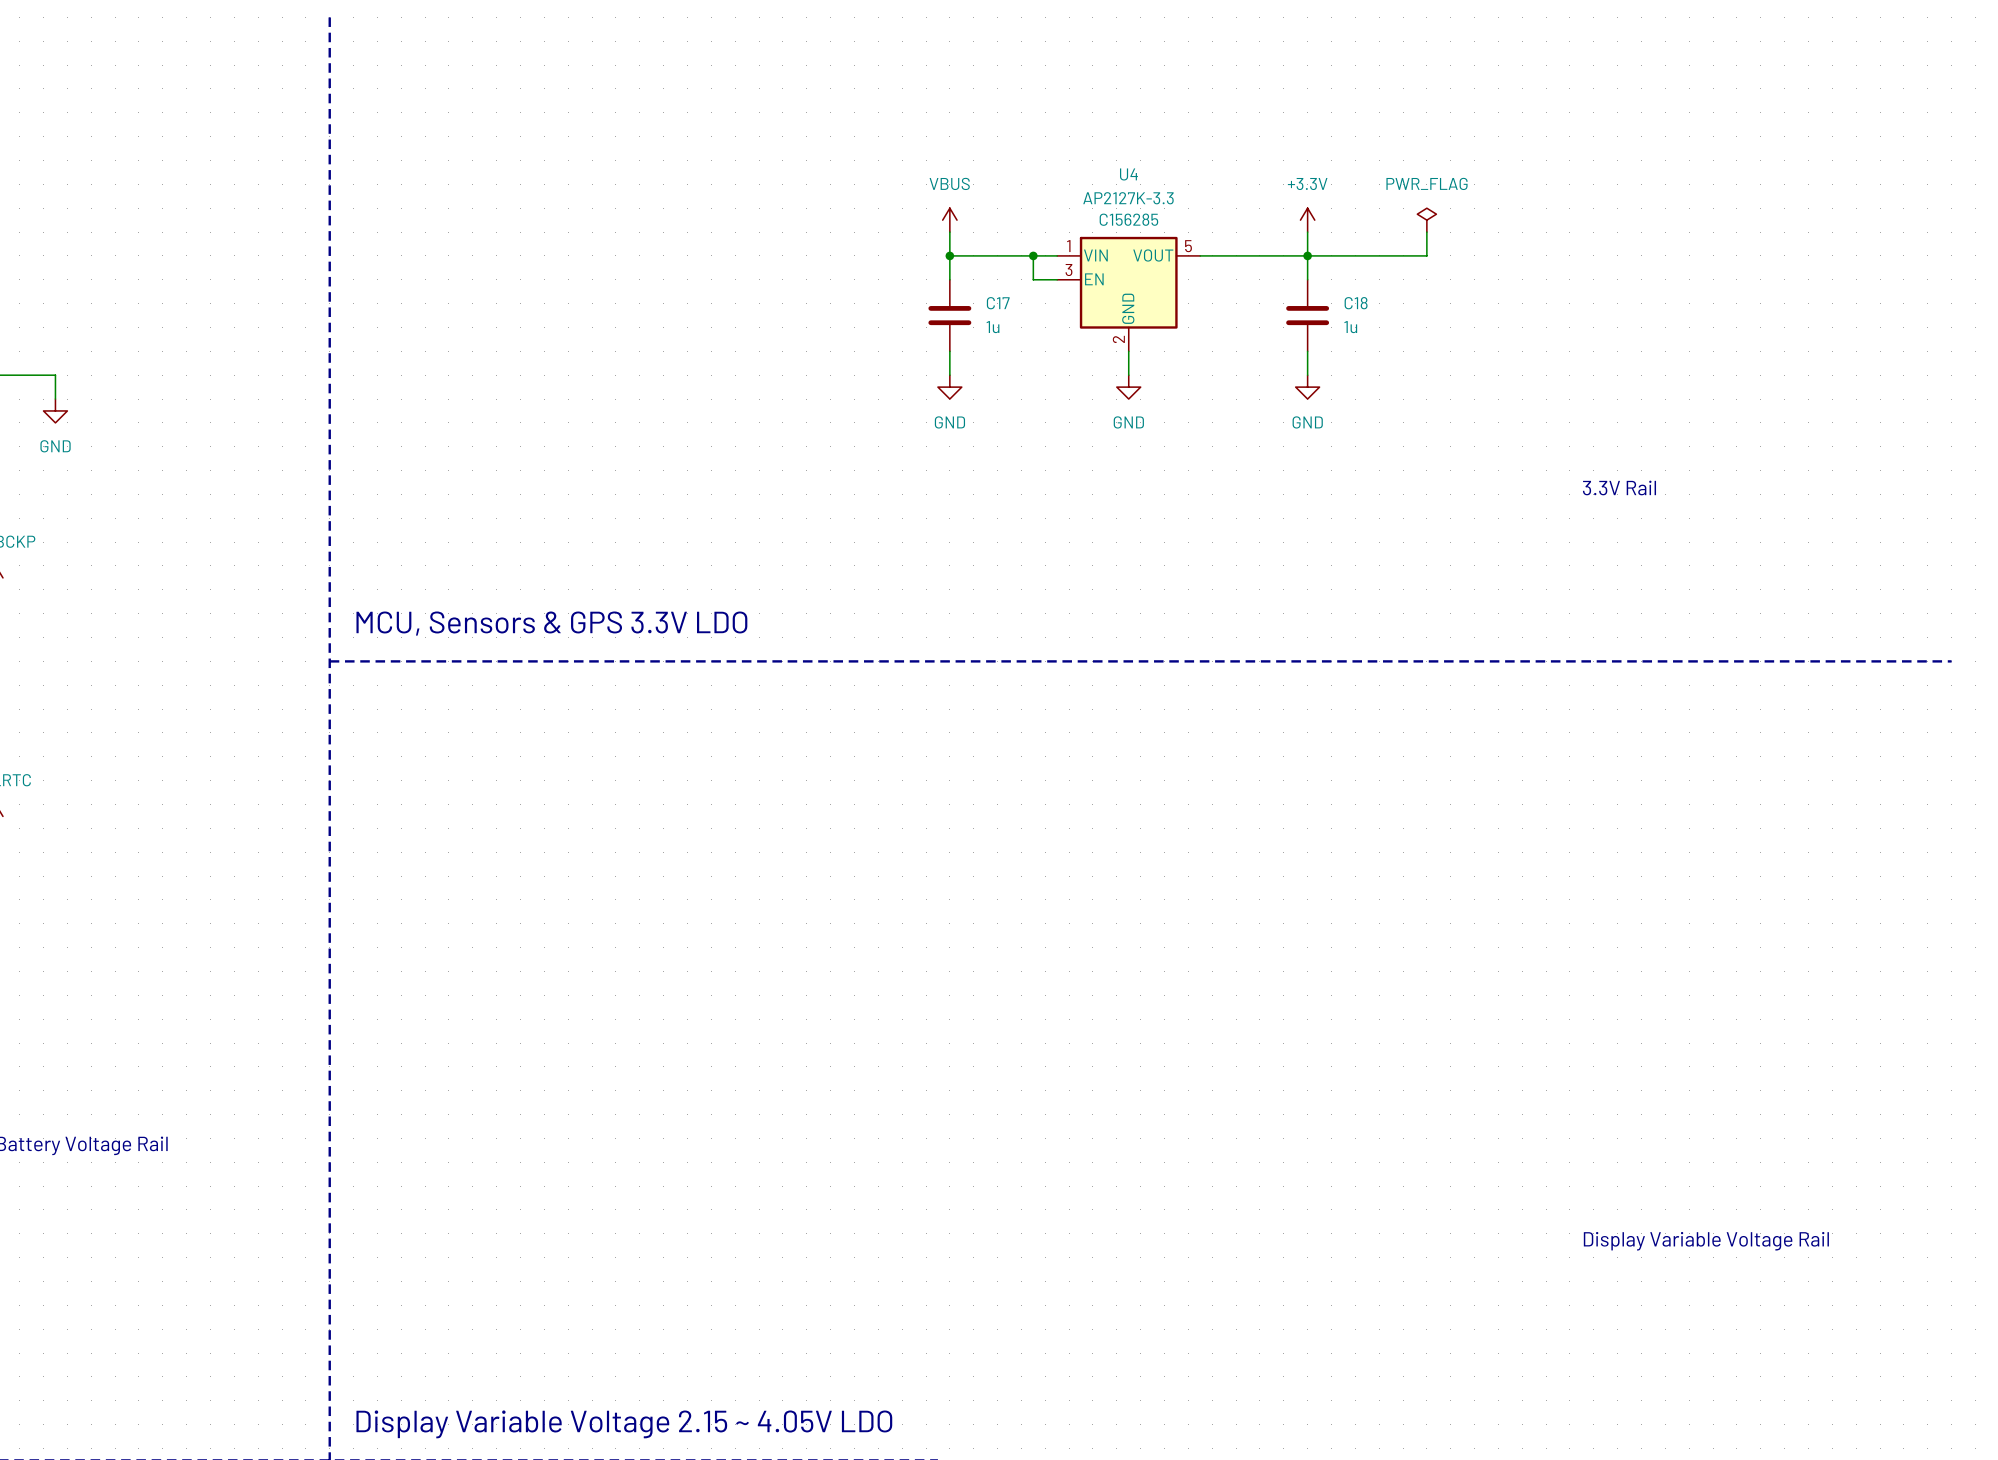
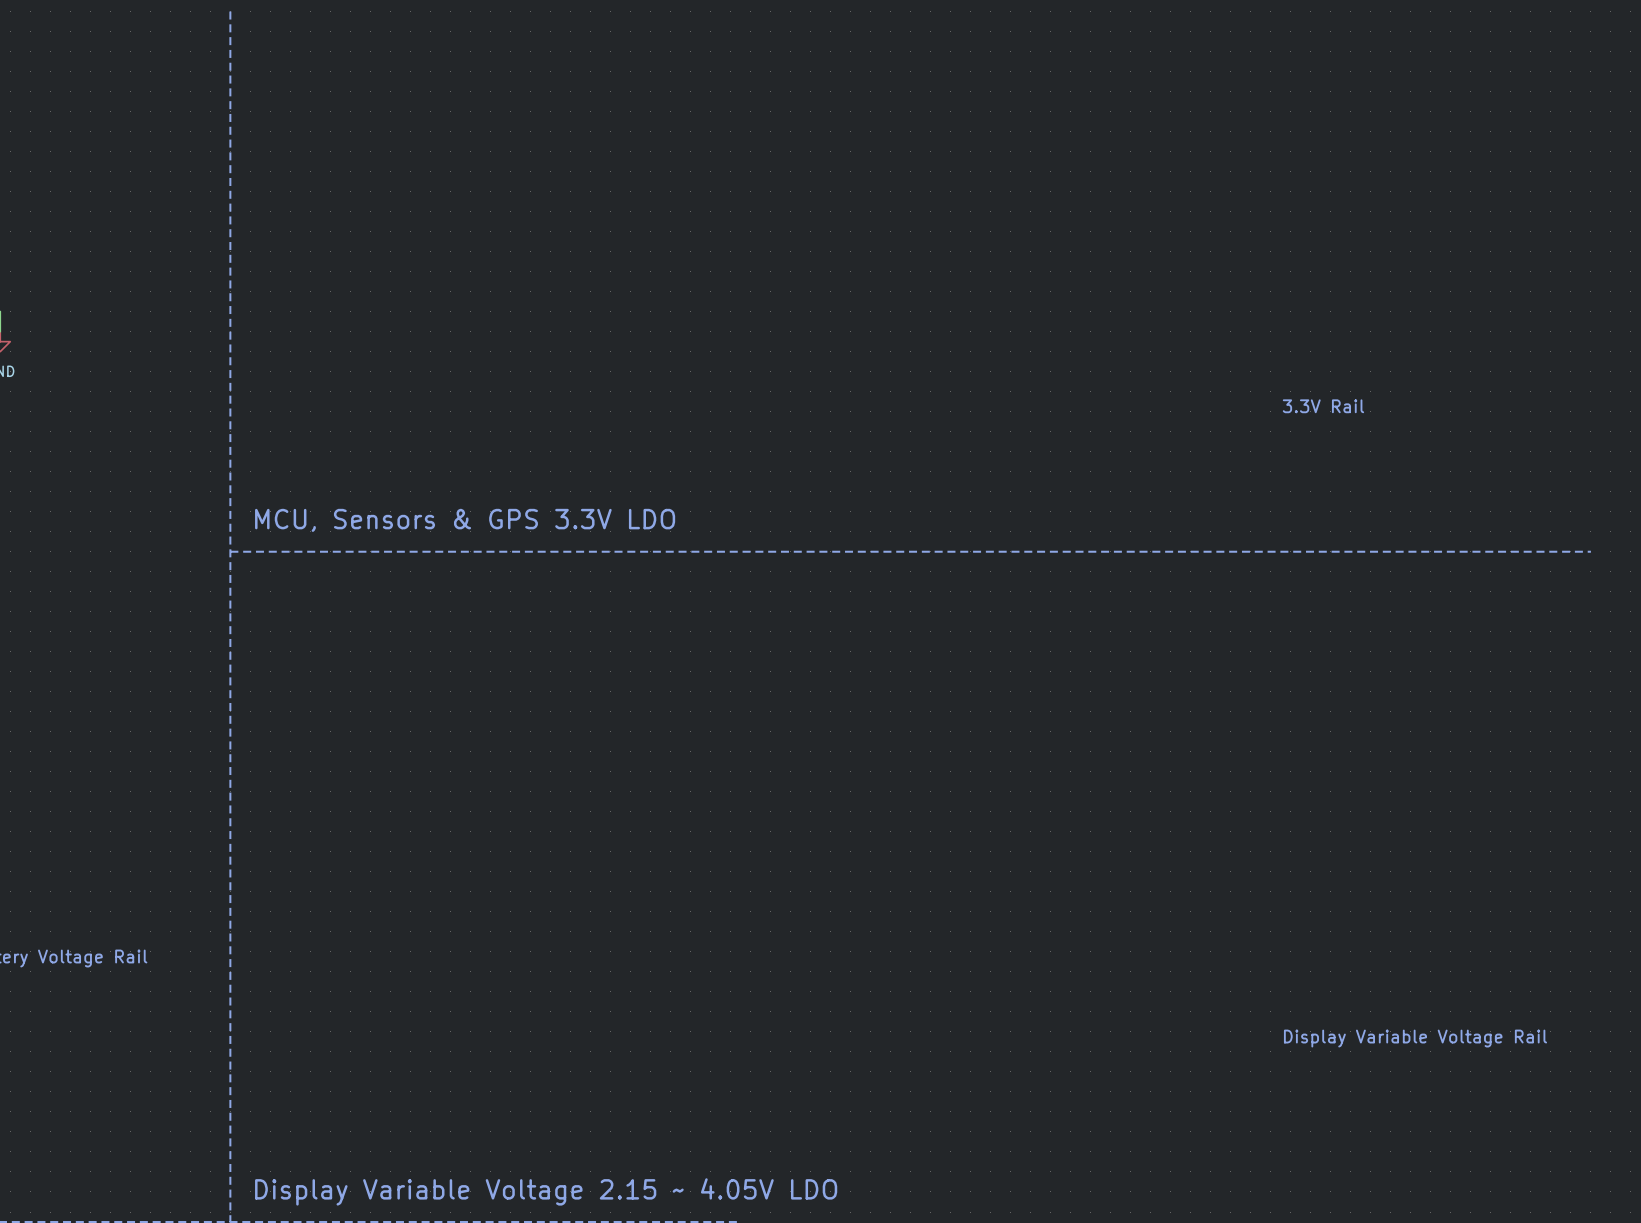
power symbol: VBUS (949, 220) -> none
power symbol: +3.3V (1307, 220) -> none
power symbol: PWR_FLAG (1426, 220) -> none
wire: (949, 232) (949, 279) -> none
wire: (1307, 232) (1307, 279) -> none
wire: (1426, 232) (1426, 255) (1200, 255) -> none
wire: (949, 255) (1057, 255) -> none
junction: (949, 255) -> none
wire: (1033, 255) (1033, 279) (1057, 279) -> none
junction: (1033, 255) -> none
junction: (1307, 255) -> none
U4: AP2127K-3.3 (1128, 294) -> none
C17: 1u (949, 315) -> none
C18: 1u (1307, 315) -> none
wire: (949, 351) (949, 375) -> none
wire: (1128, 351) (1128, 375) -> none
wire: (1307, 351) (1307, 375) -> none
power symbol: GND (949, 387) -> none
power symbol: GND (1128, 387) -> none
power symbol: GND (1307, 387) -> none

